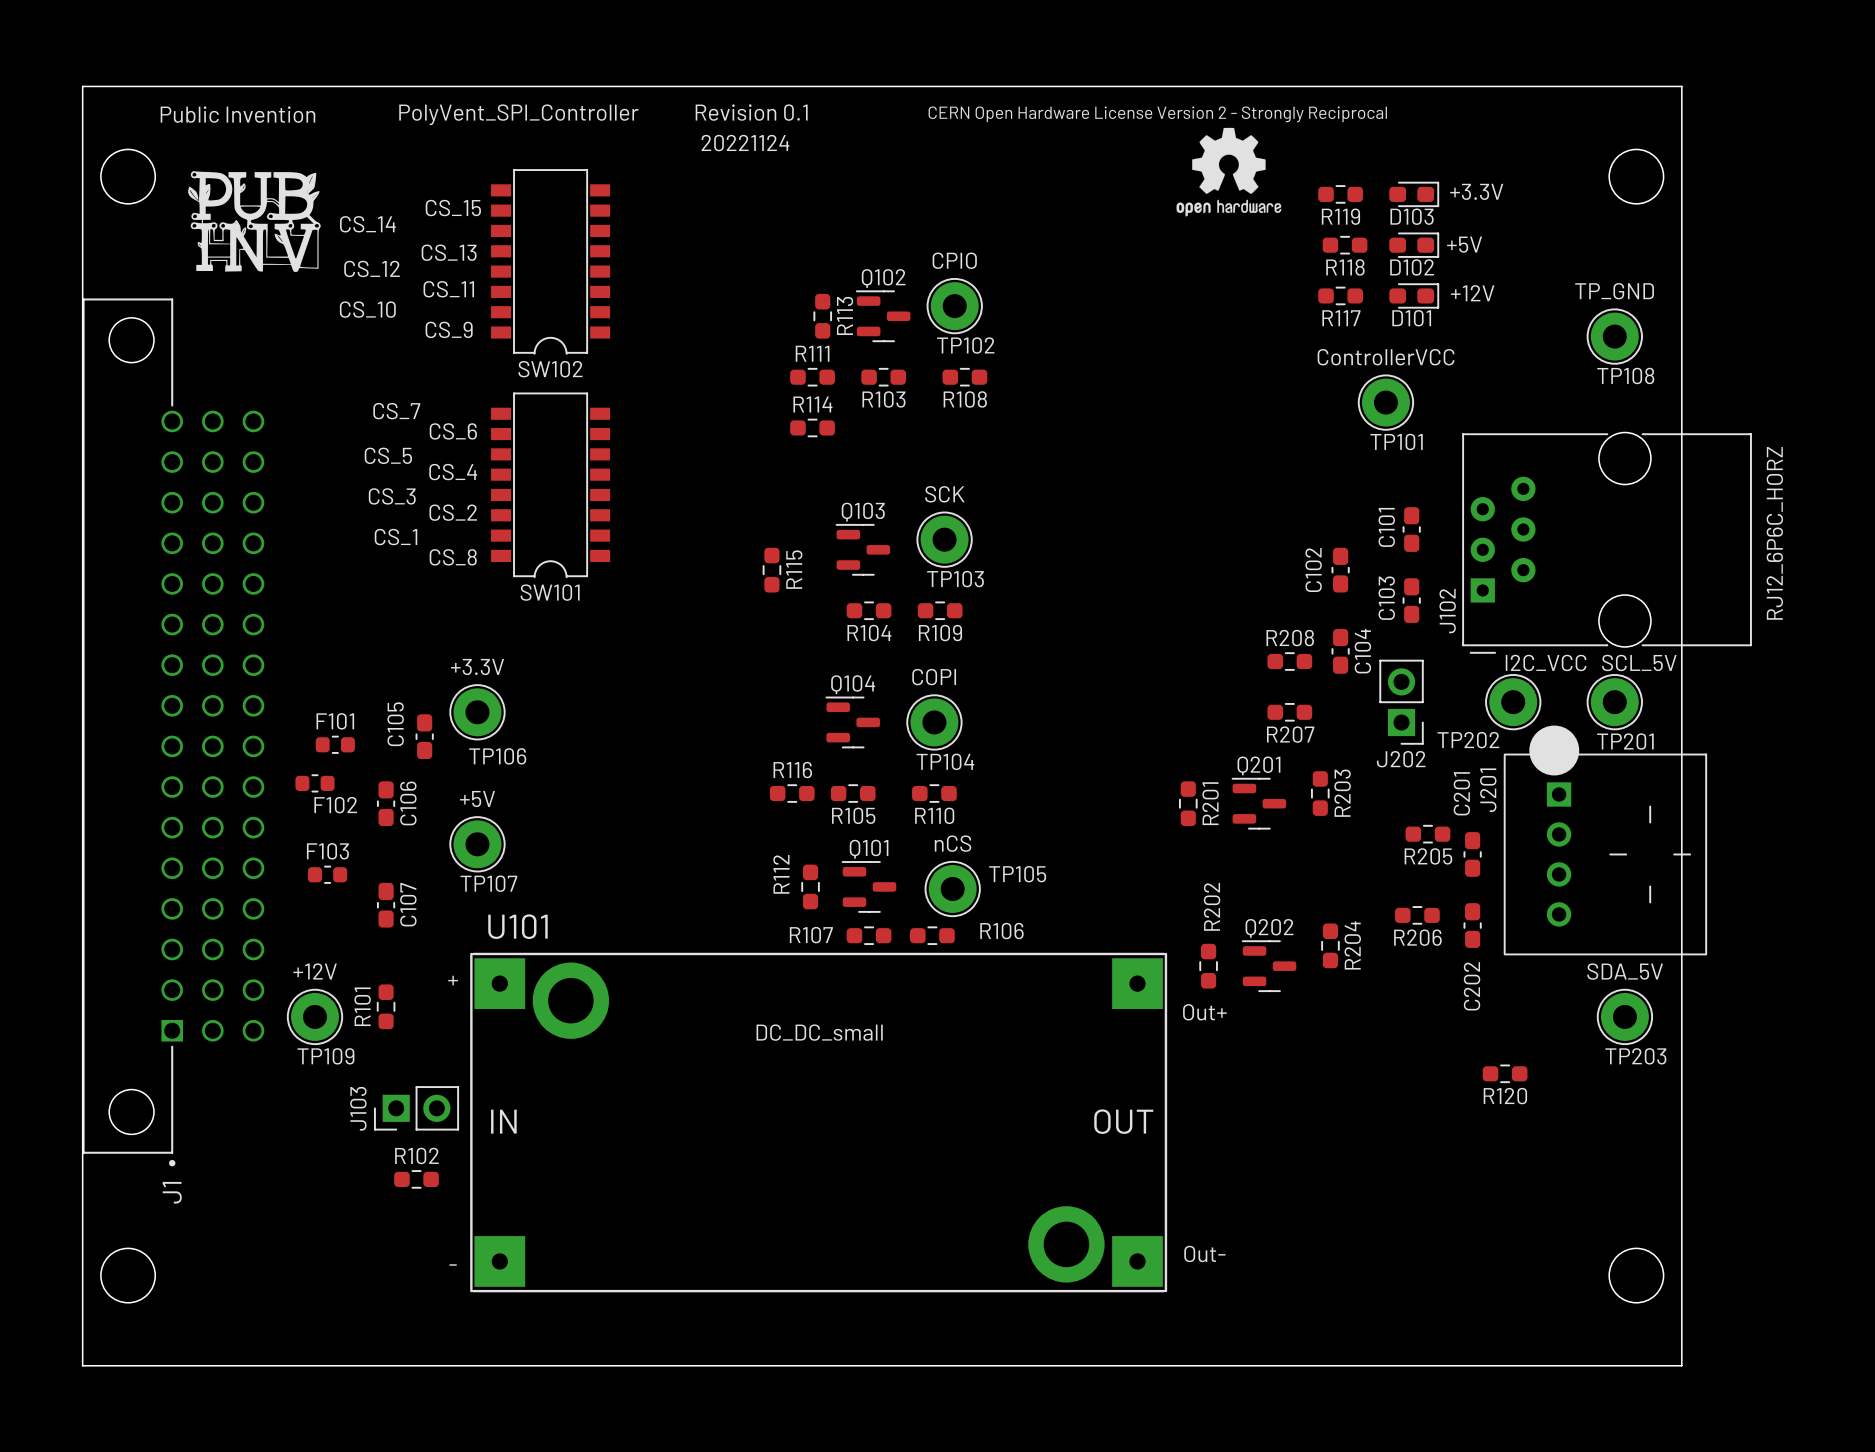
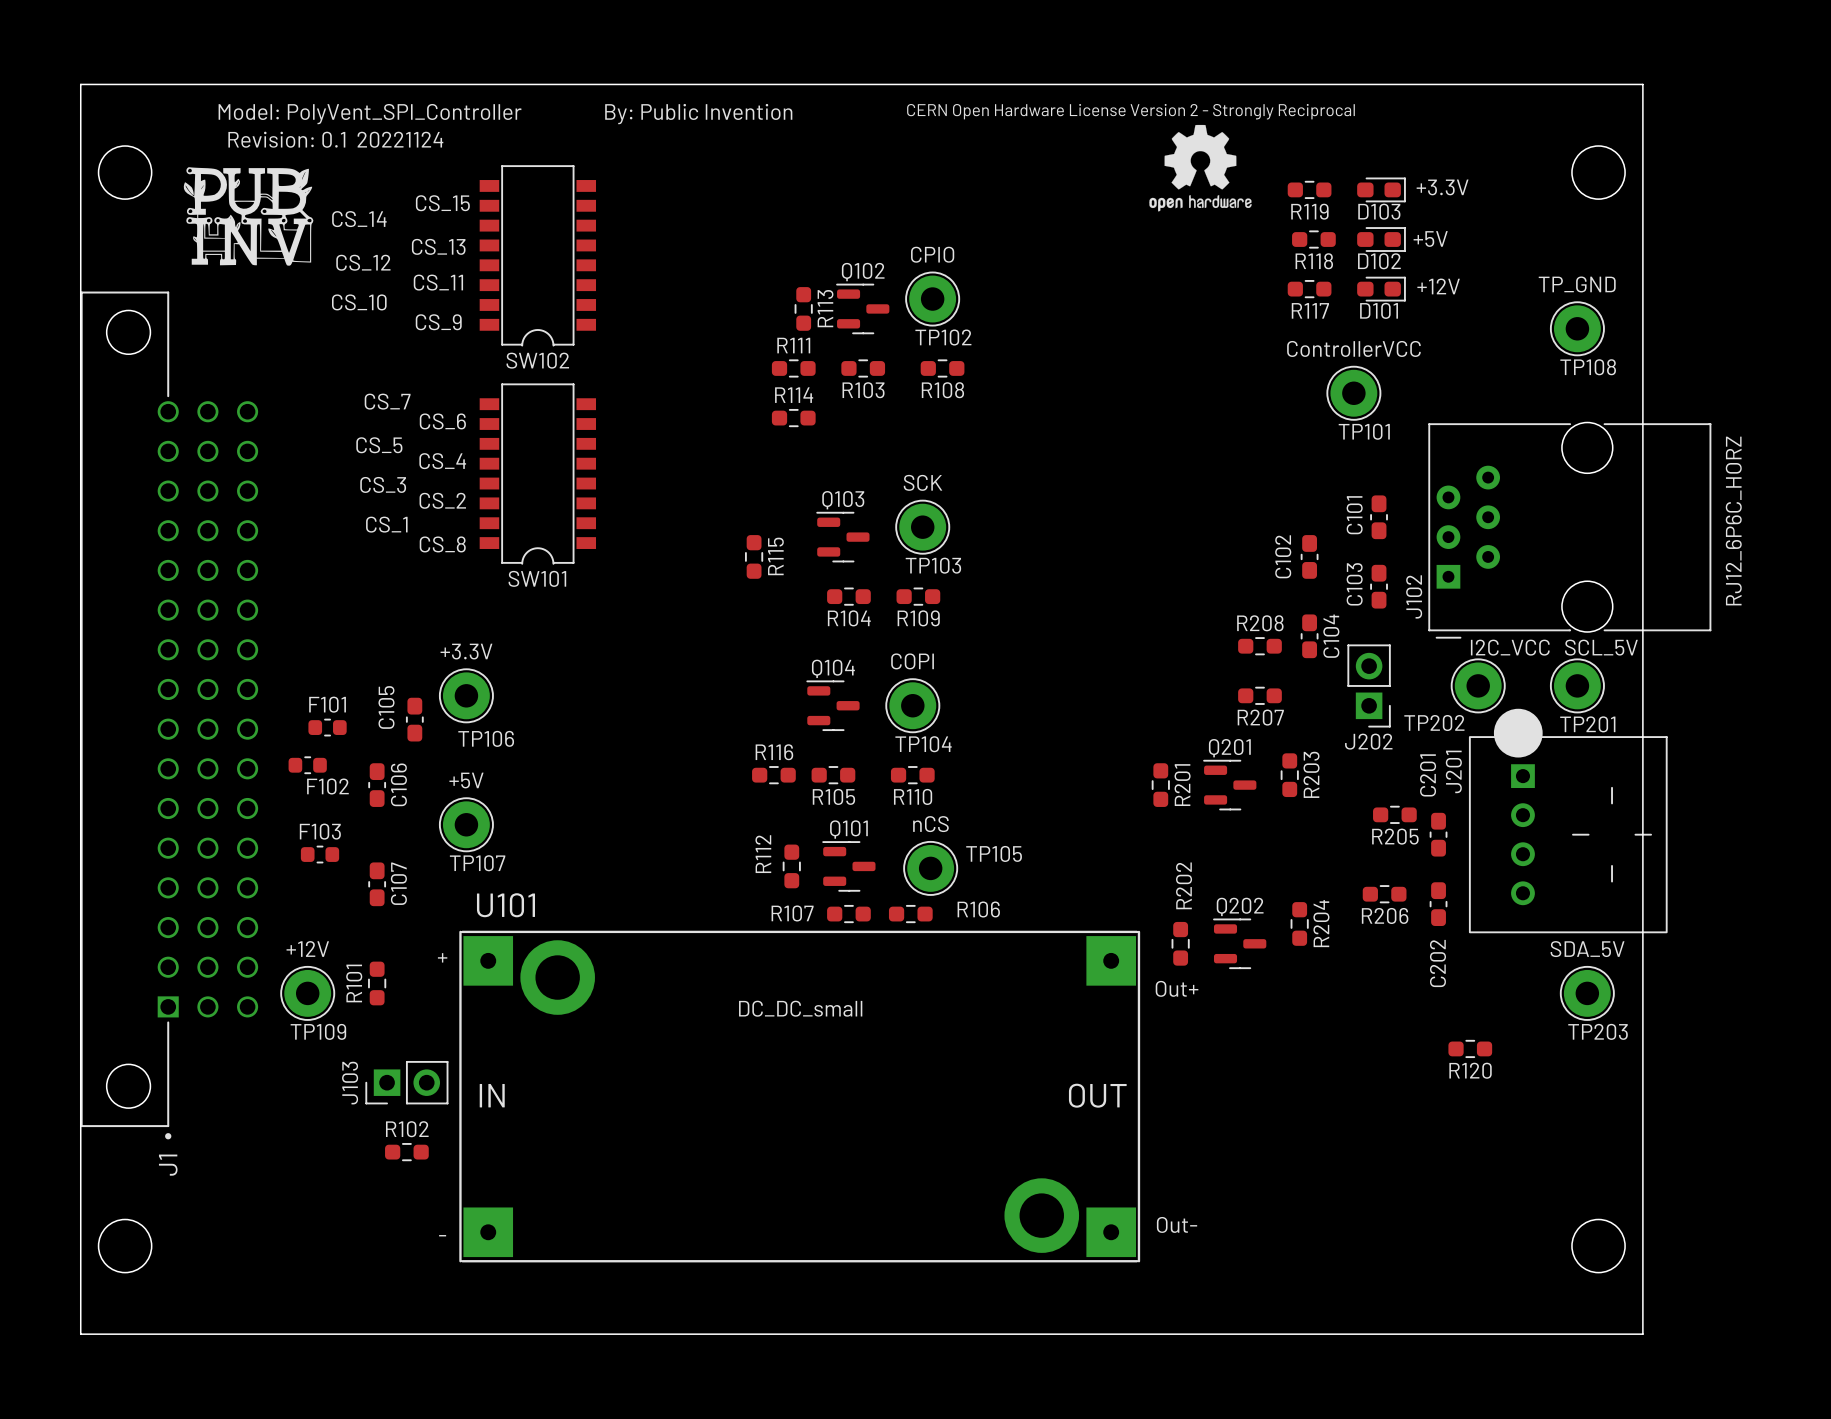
text: Revision 0.1 (751, 112) -> none
text: Public Invention (237, 114) -> none
text: PolyVent_SPI_Controller (518, 114) -> Model: PolyVent_SPI_Controller (370, 114)
text: none -> By: Public Invention (698, 114)
text: none -> Revision: 0.1 20221124 (335, 139)
text: 20221124 (745, 143) -> none

